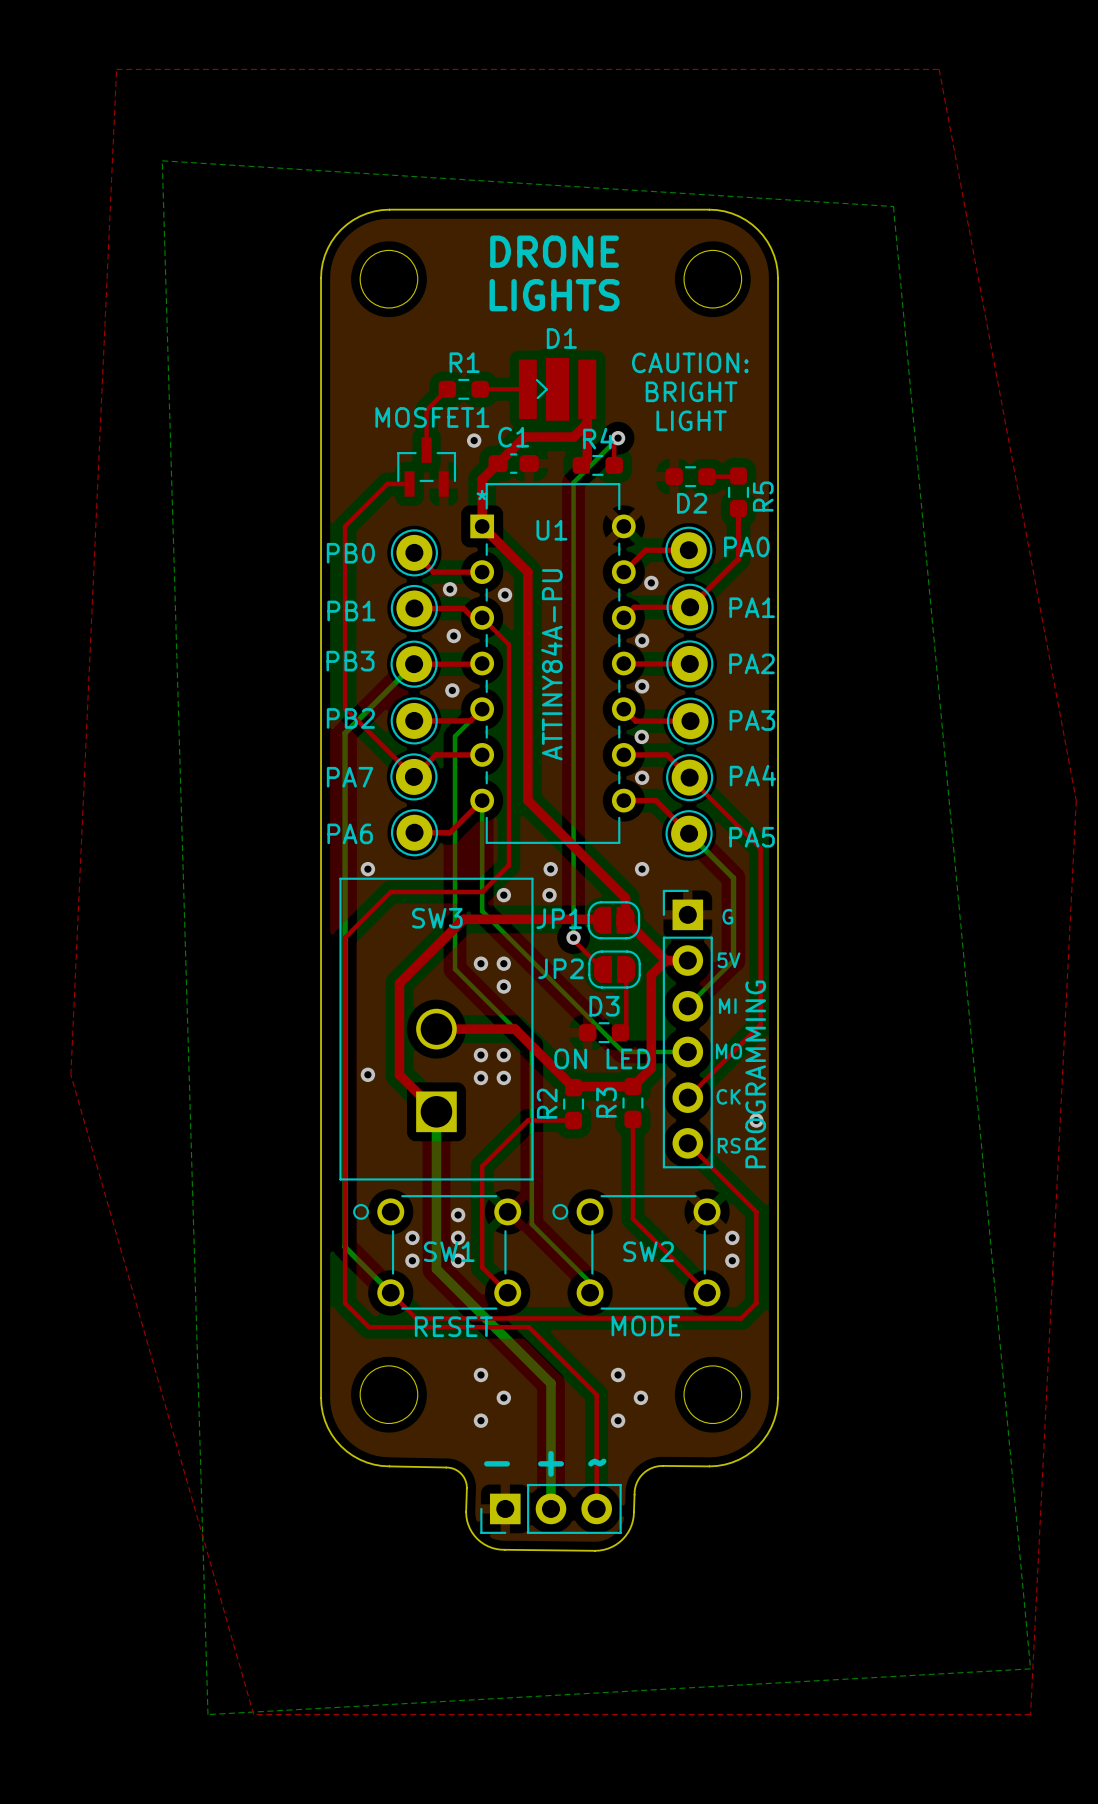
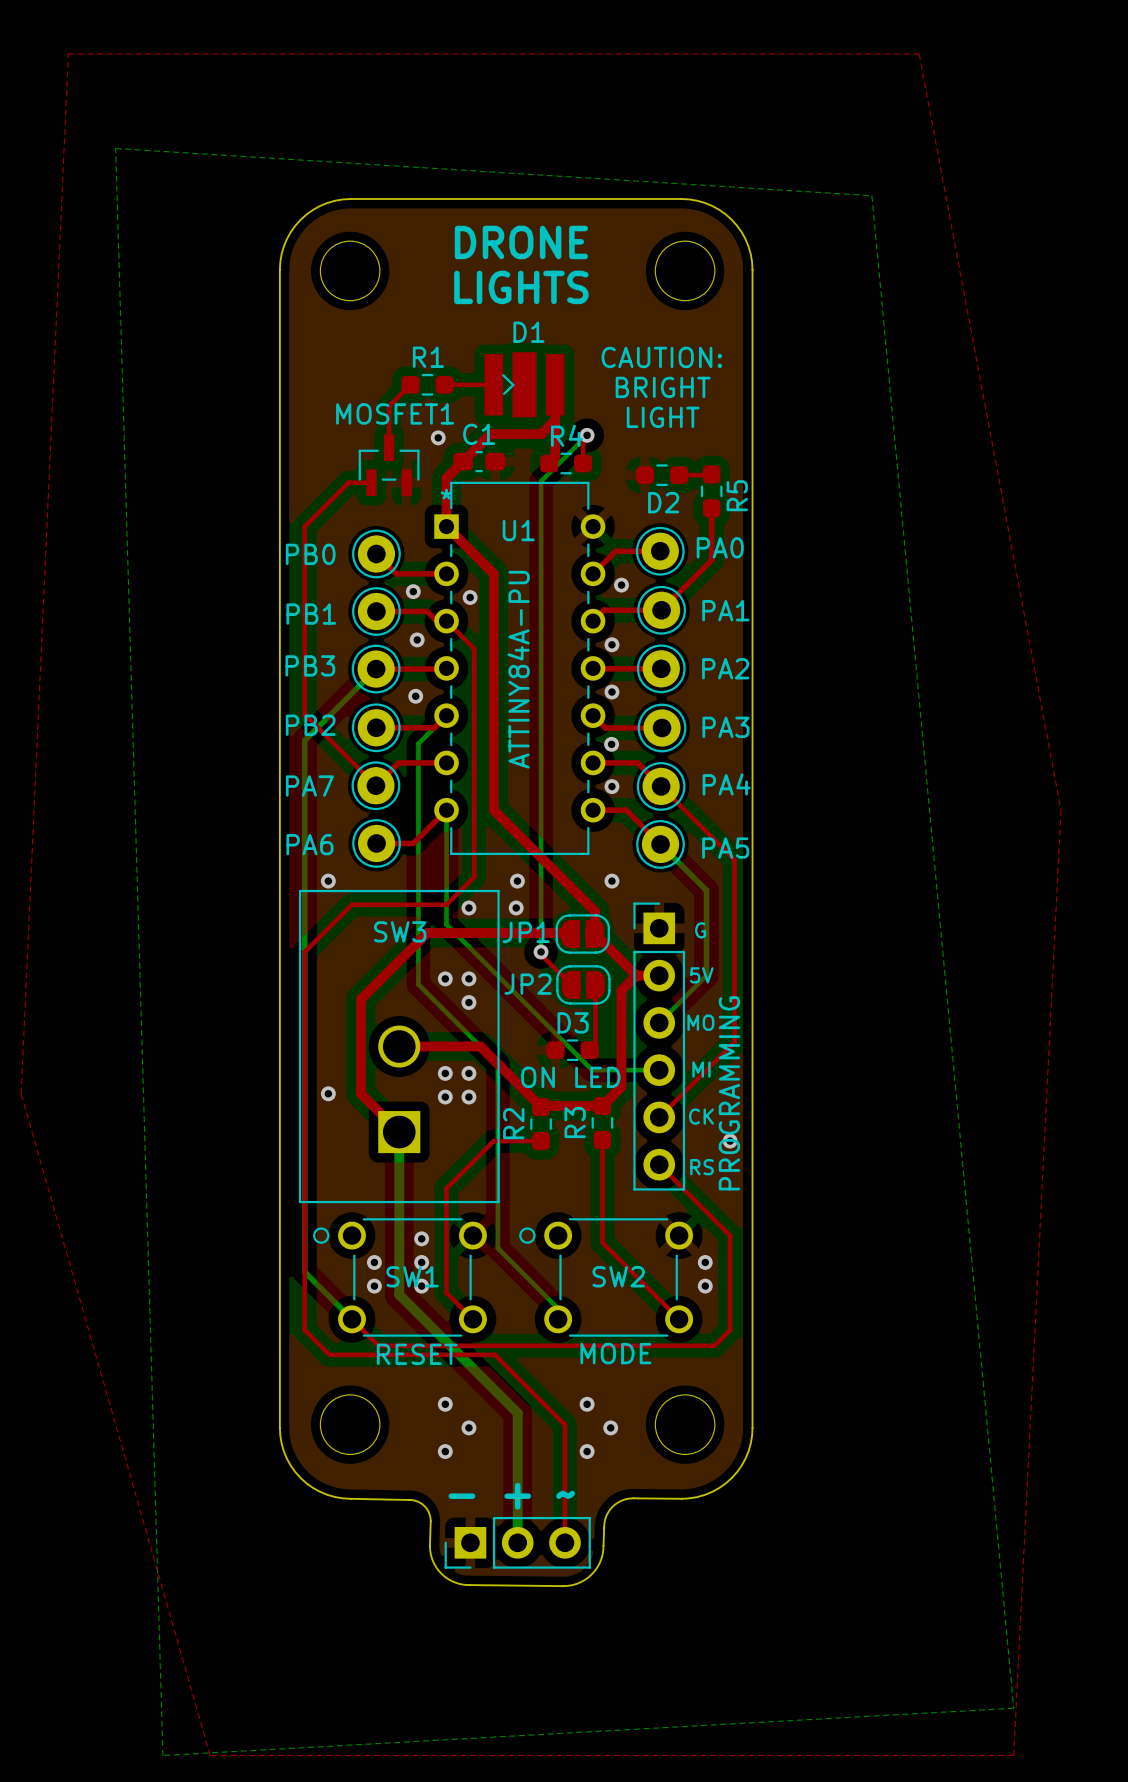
text: MI (727, 1006) -> MO (700, 1022)
text: MO (728, 1051) -> MI (701, 1069)

